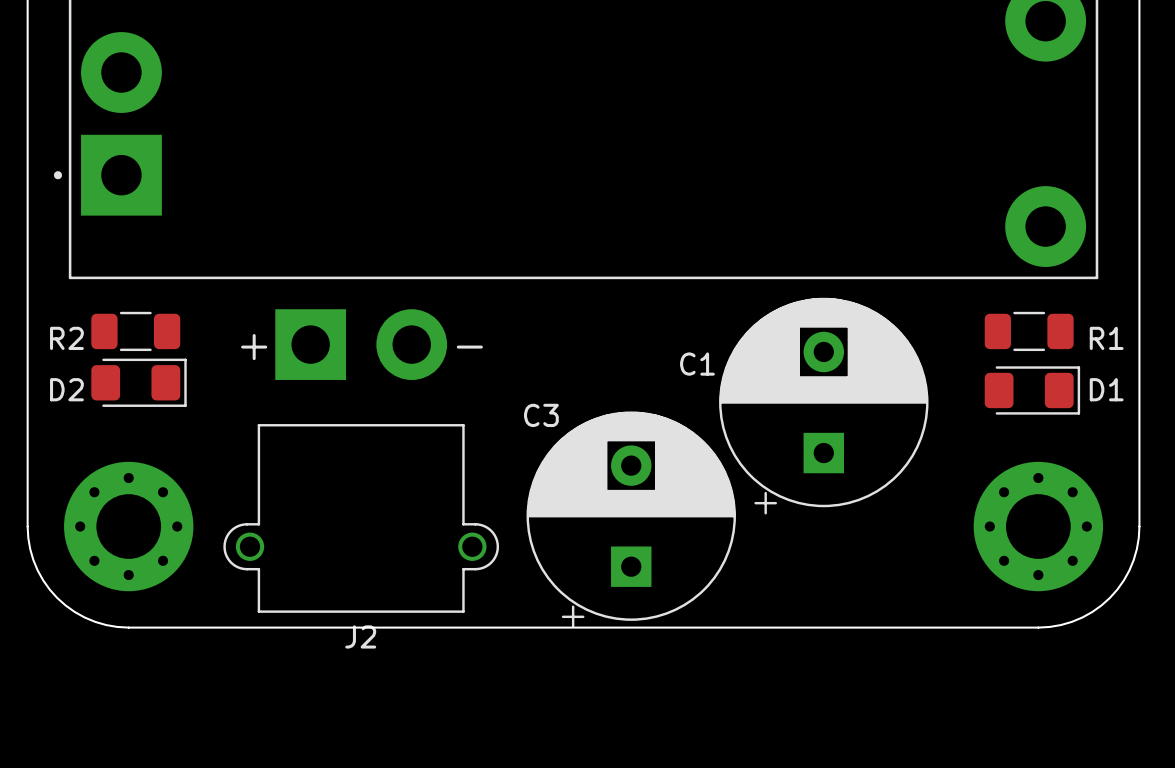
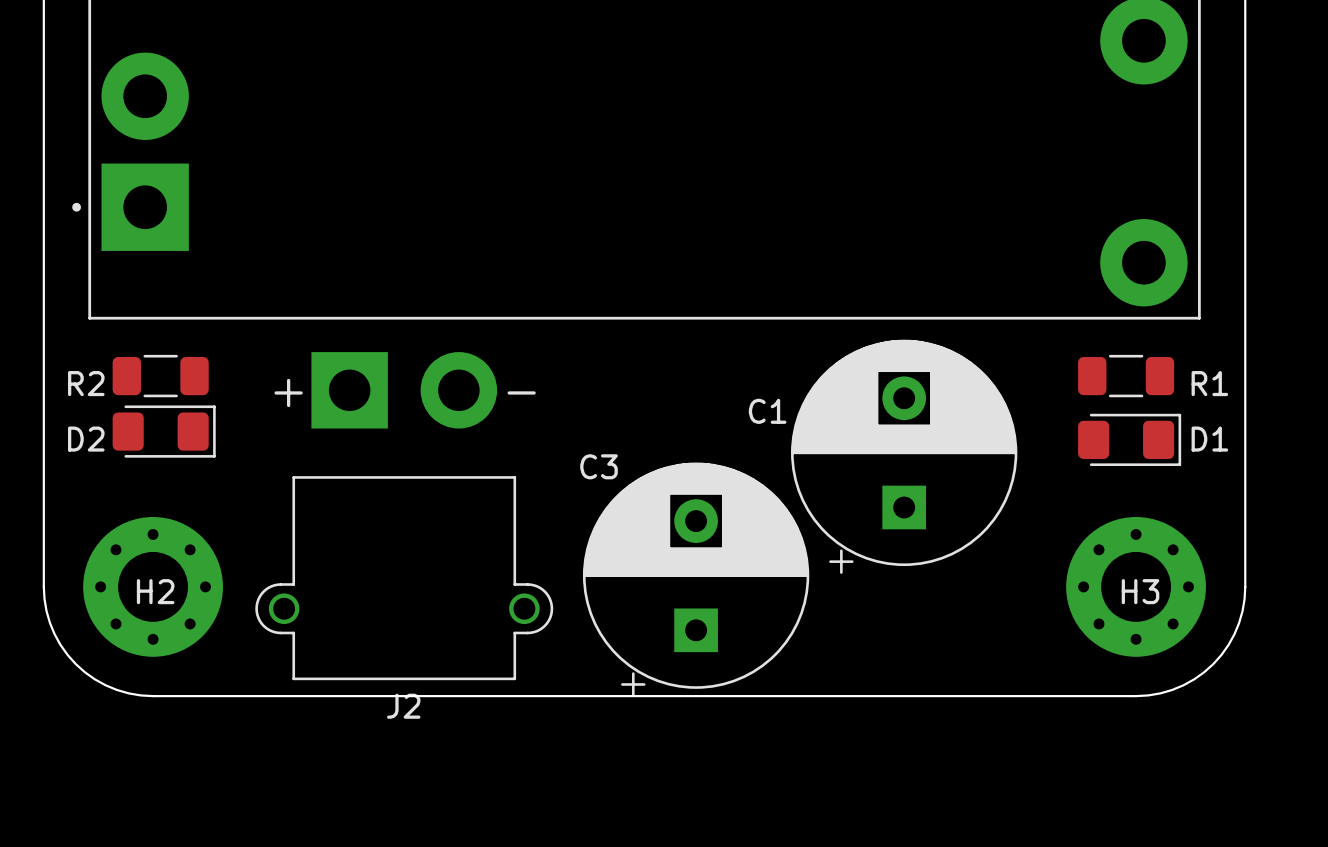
H2 name: none -> H2 (155, 591)
H3 name: none -> H3 (1140, 591)

